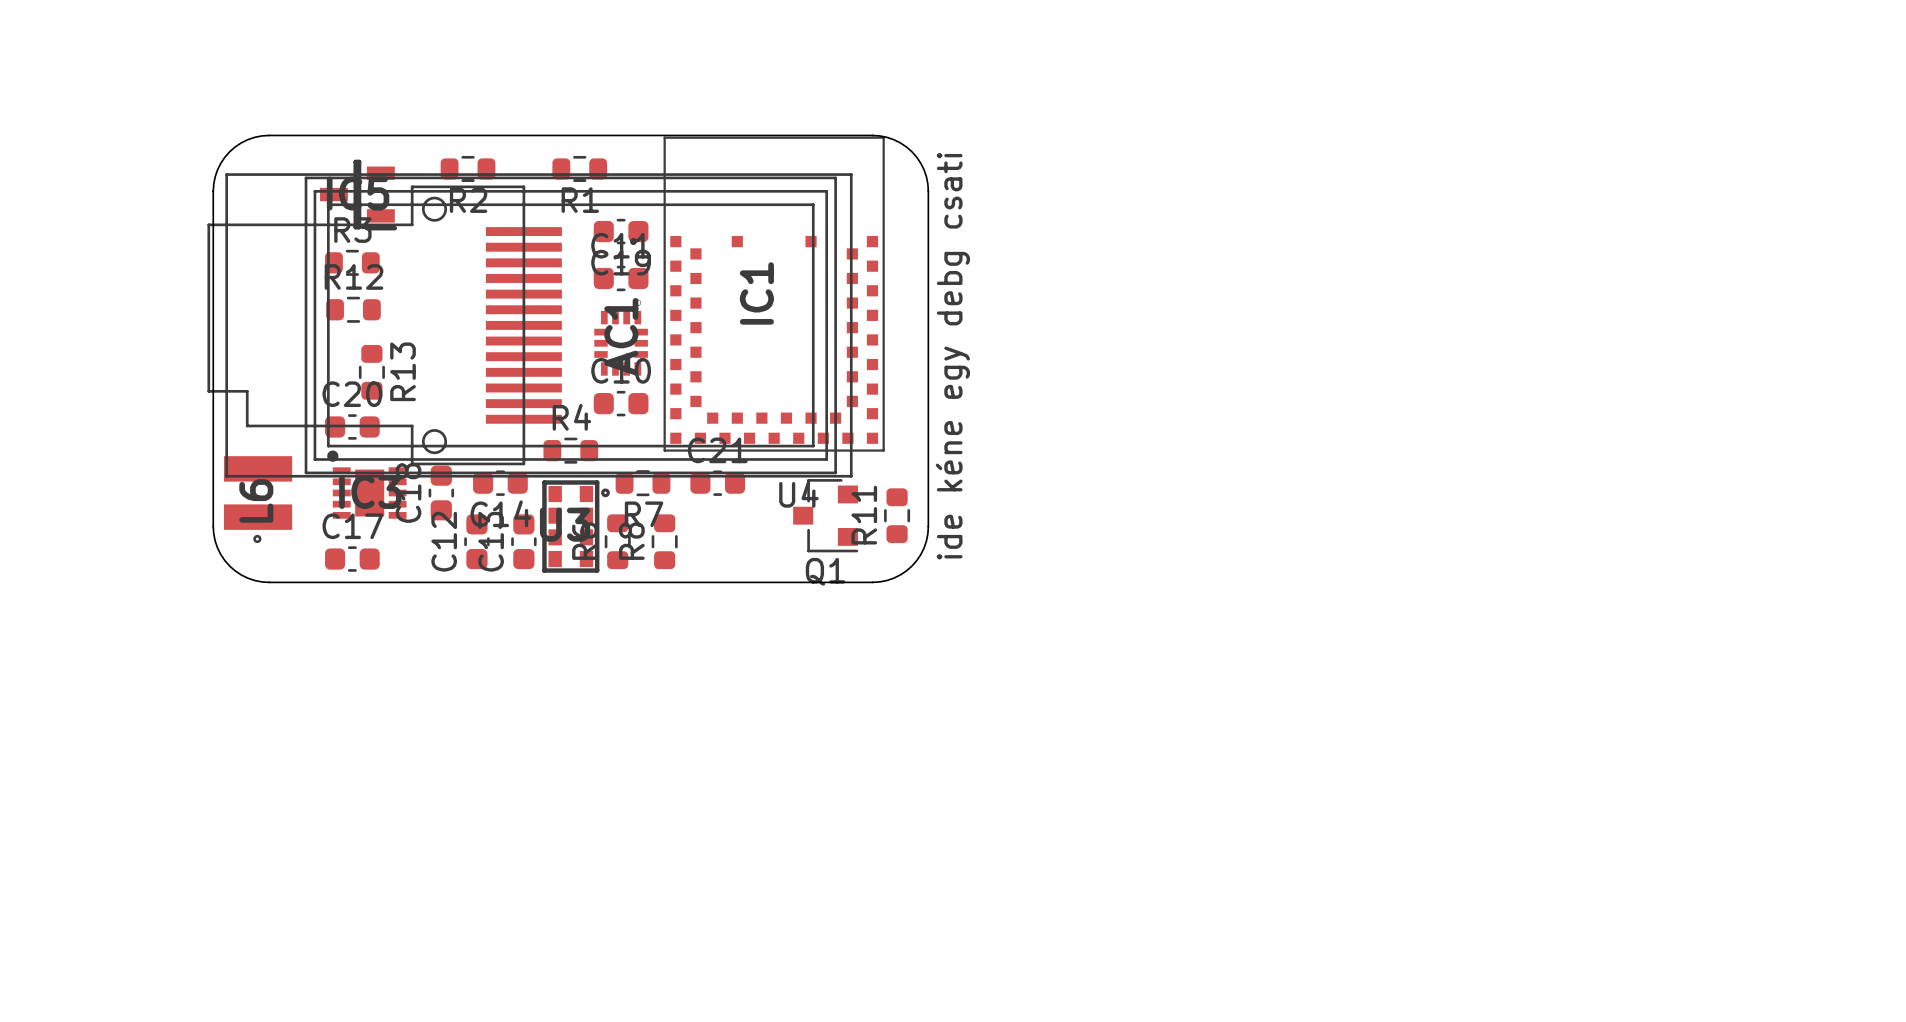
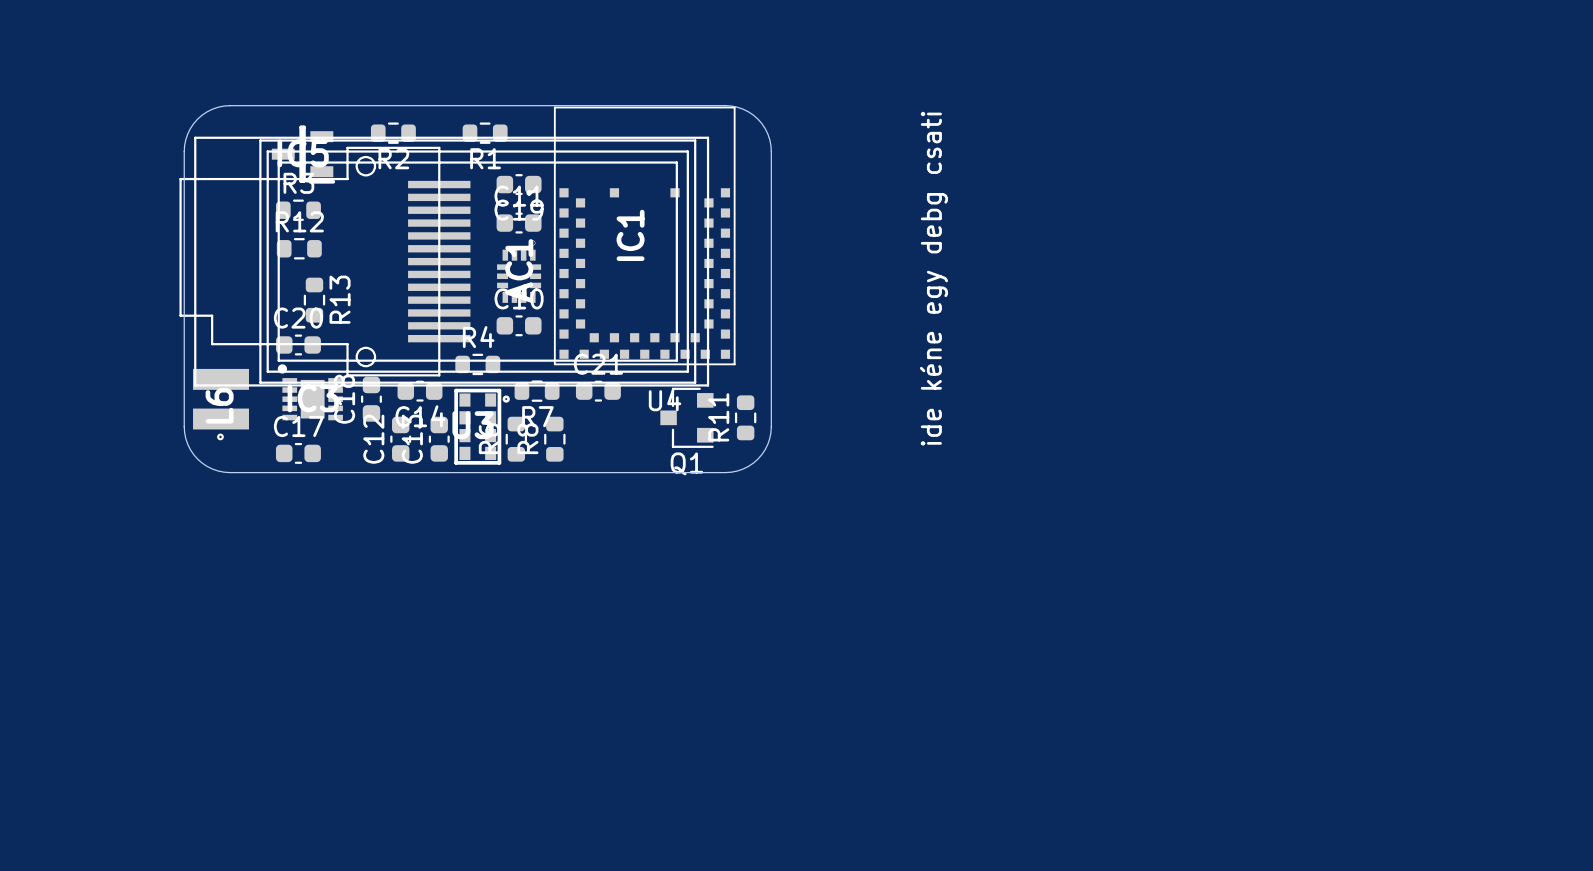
text position: ide kéne egy debg csati (952, 356) -> ide kéne egy debg csati (933, 278)

